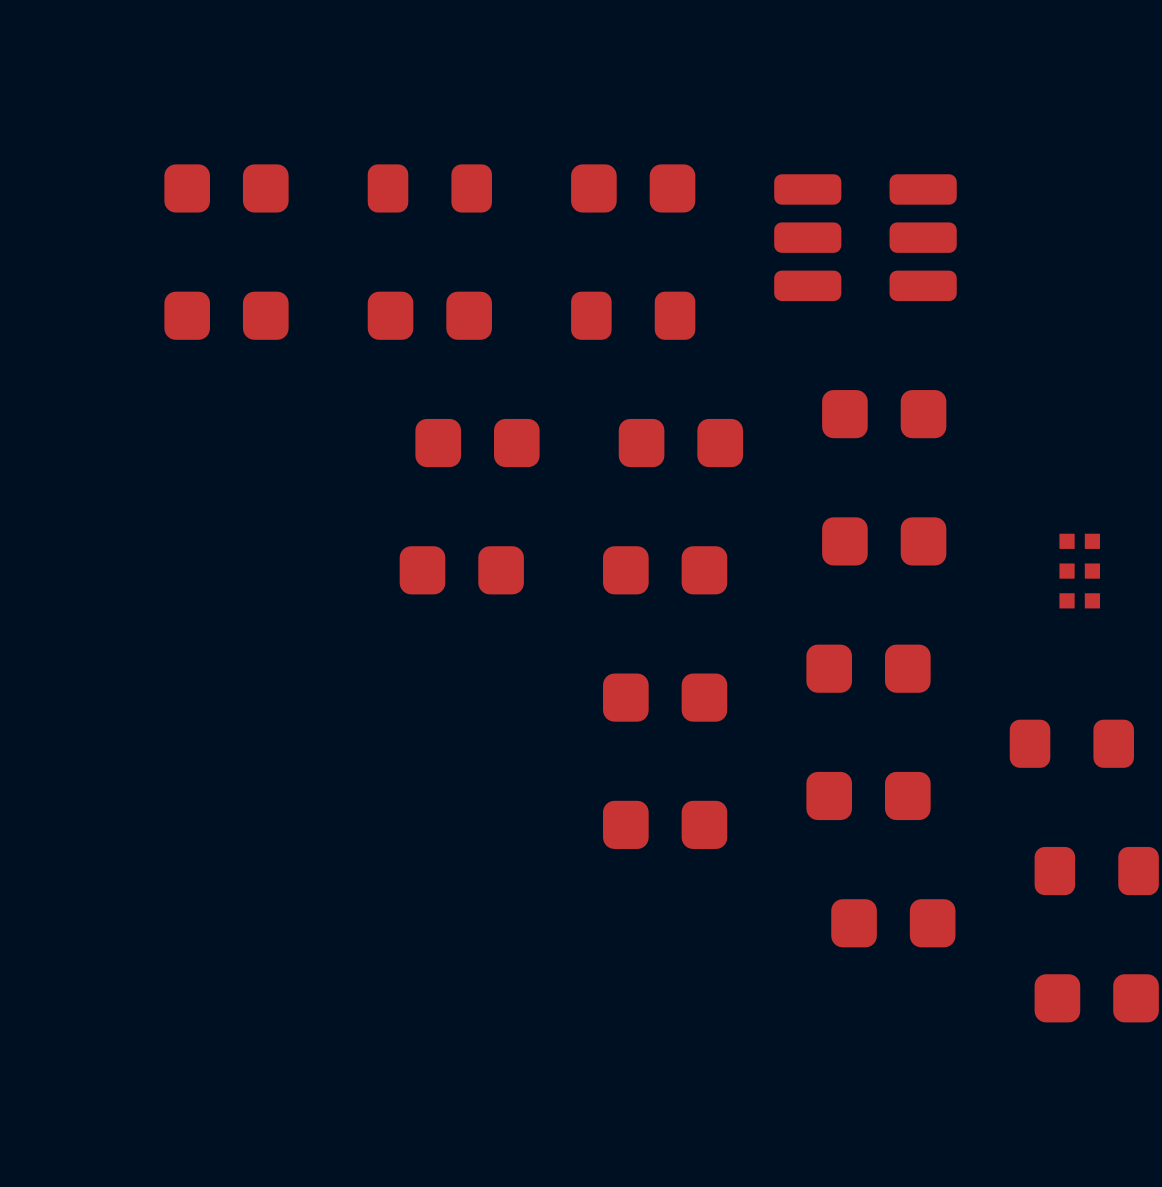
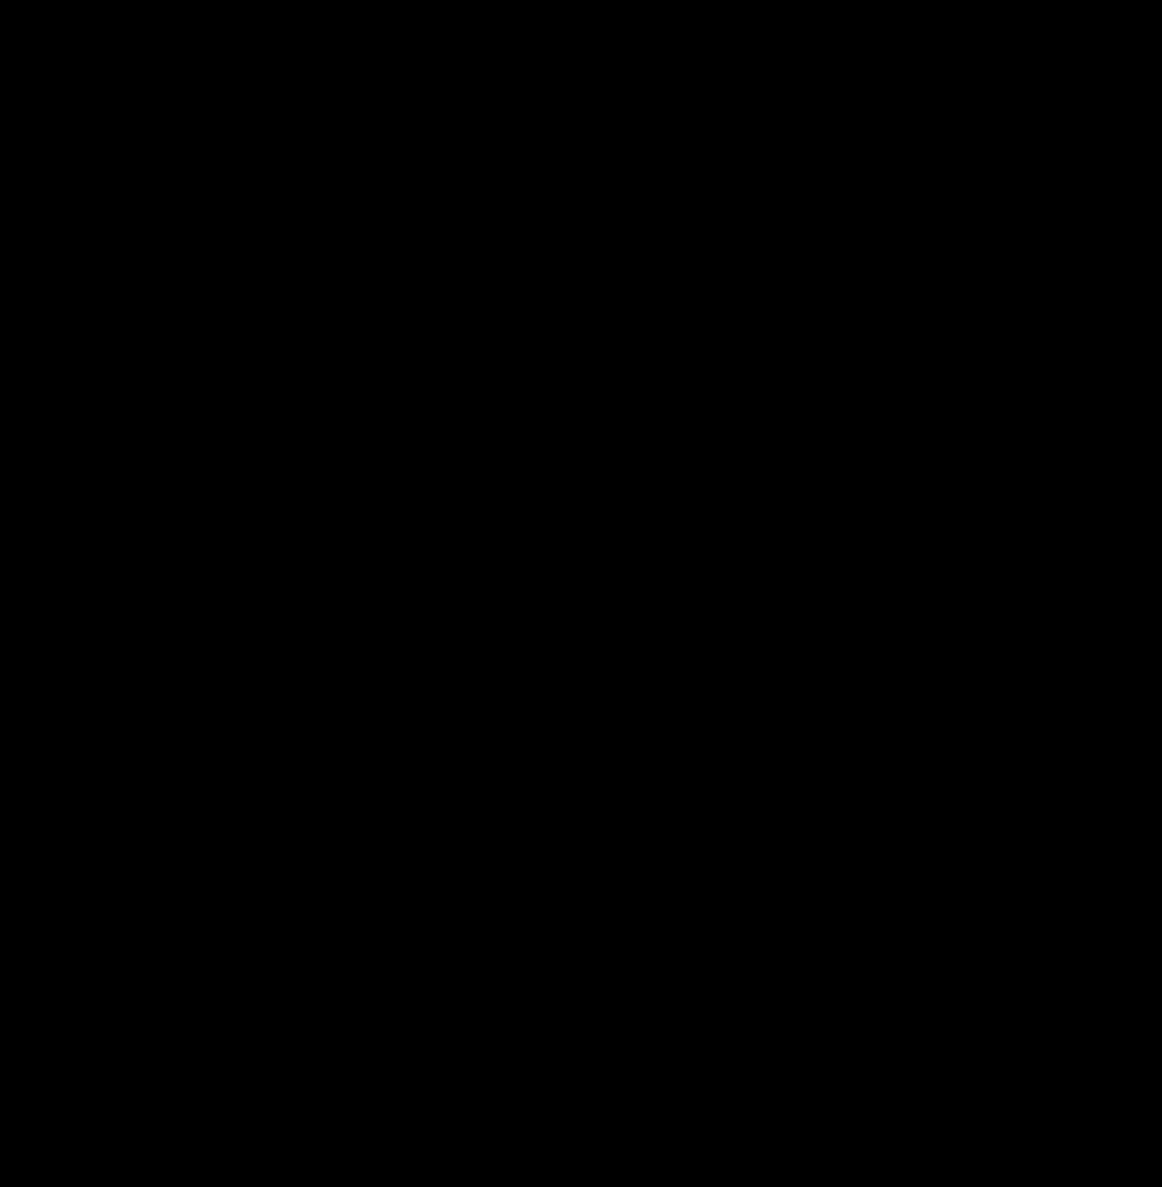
part: (226, 188) -> none
part: (429, 188) -> none
part: (633, 188) -> none
part: (865, 237) -> none
part: (226, 315) -> none
part: (429, 315) -> none
part: (633, 315) -> none
part: (884, 414) -> none
part: (477, 443) -> none
part: (680, 443) -> none
part: (884, 541) -> none
part: (461, 570) -> none
part: (665, 570) -> none
part: (1079, 571) -> none
part: (868, 668) -> none
part: (665, 697) -> none
part: (1071, 743) -> none
part: (868, 795) -> none
part: (665, 824) -> none
part: (1096, 871) -> none
part: (893, 923) -> none
part: (1096, 998) -> none

